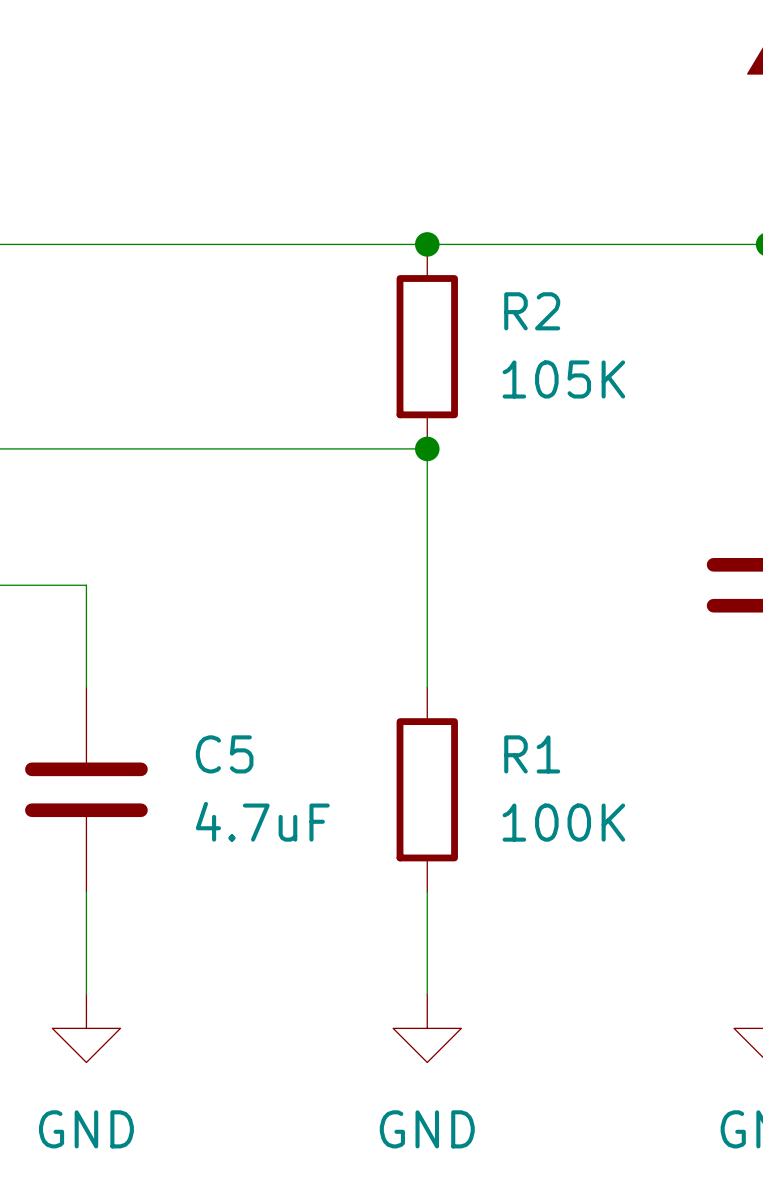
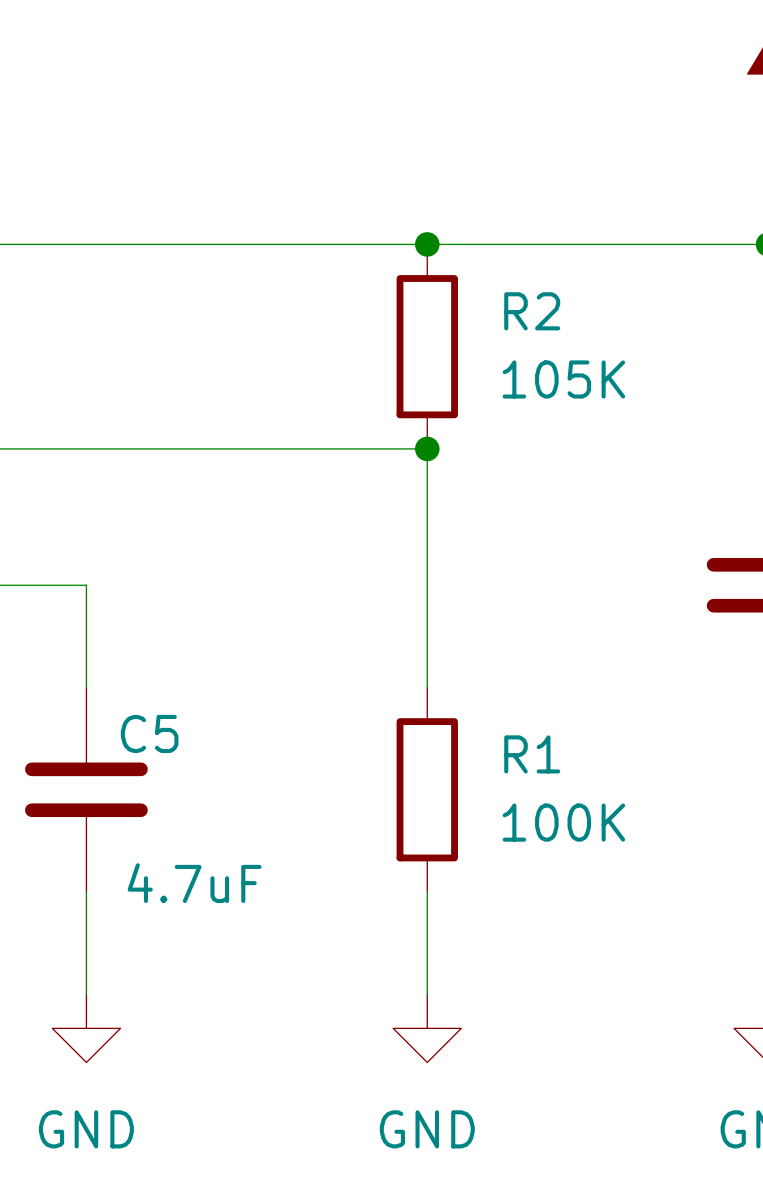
C5 name position: C5 (224, 754) -> C5 (149, 733)
C5 value position: 4.7uF (262, 821) -> 4.7uF (194, 883)

